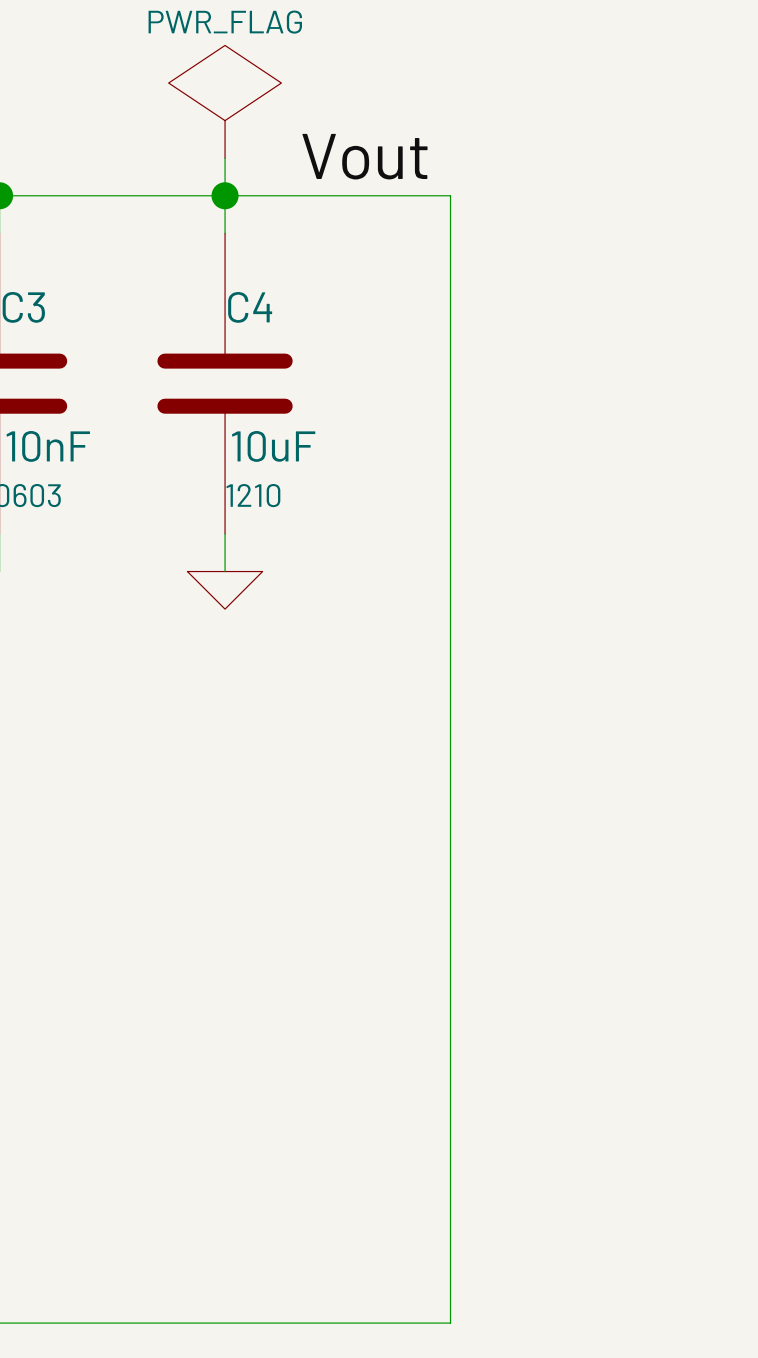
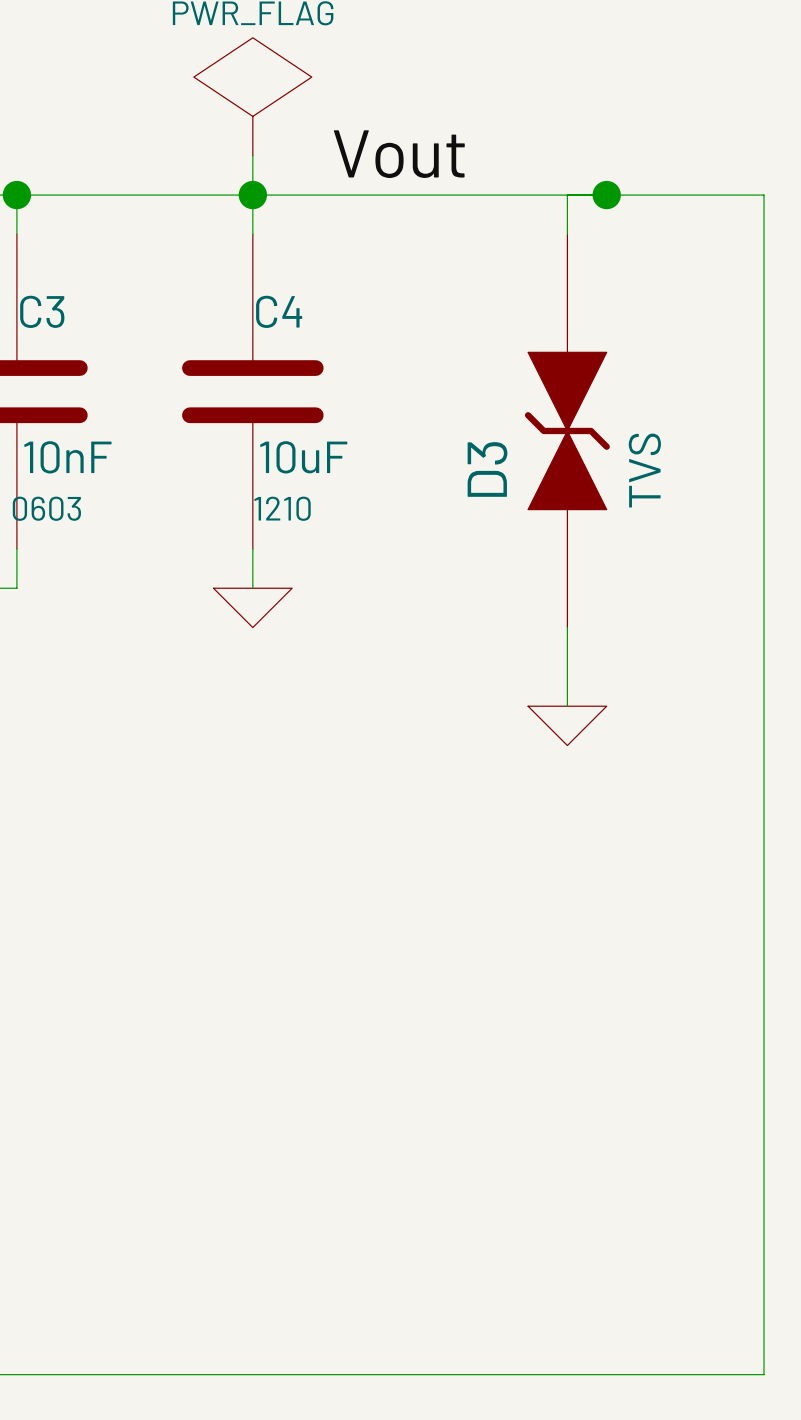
wire: (450, 195) (450, 1323) -> (488, 195) (763, 195) (763, 1374) (488, 1374)
wire: none -> (567, 195) (567, 234)
junction: none -> (606, 195)
D3: none -> TVS (567, 430)
wire: none -> (567, 627) (567, 706)
power symbol: none -> (567, 725)

